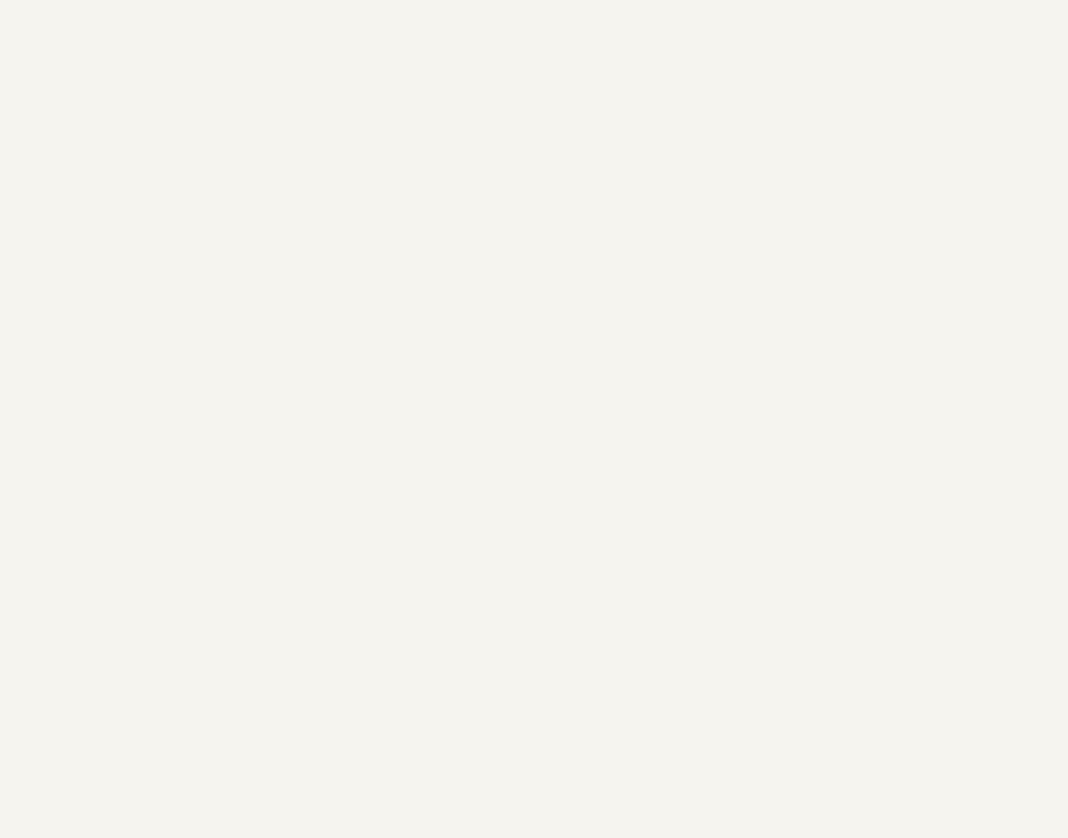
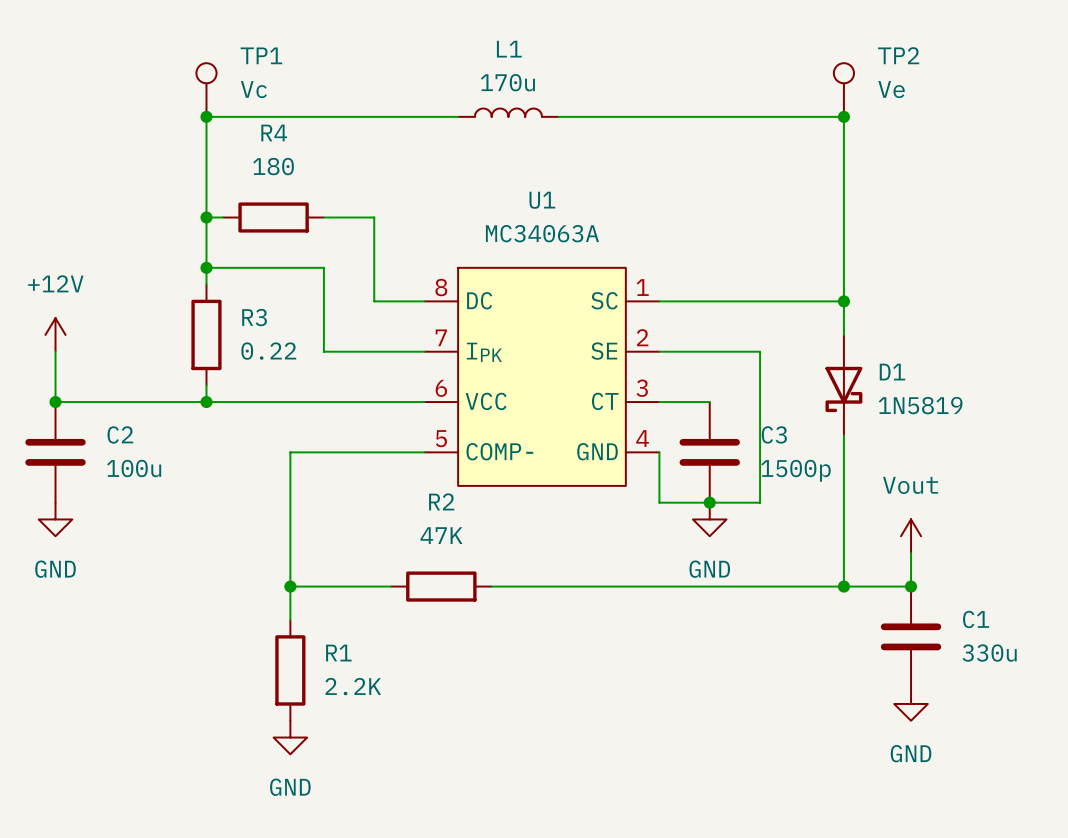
TP1: none -> Vc (206, 90)
TP2: none -> Ve (843, 90)
L1: none -> 170u (508, 112)
junction: none -> (206, 116)
wire: none -> (458, 116) (206, 116) (206, 284)
wire: none -> (558, 116) (843, 116) (843, 334)
junction: none -> (843, 116)
wire: none -> (206, 217) (223, 217)
junction: none -> (206, 217)
R4: none -> 180 (273, 217)
wire: none -> (323, 217) (374, 217) (374, 301) (424, 301)
wire: none -> (206, 267) (323, 267) (323, 351) (424, 351)
junction: none -> (206, 267)
wire: none -> (659, 301) (843, 301)
junction: none -> (843, 301)
power symbol: none -> +12V (55, 334)
R3: none -> 0.22 (206, 334)
wire: none -> (55, 351) (55, 402) (424, 402)
wire: none -> (659, 351) (760, 351) (760, 502) (659, 502) (659, 452)
U1: none -> MC34063A (541, 376)
wire: none -> (206, 385) (206, 402)
D1: none -> 1N5819 (843, 385)
junction: none -> (55, 402)
junction: none -> (206, 402)
wire: none -> (659, 402) (709, 402)
wire: none -> (843, 435) (843, 586)
C2: none -> 100u (55, 452)
wire: none -> (424, 452) (290, 452) (290, 620)
C3: none -> 1500p (709, 452)
junction: none -> (709, 502)
power symbol: none -> GND (55, 519)
power symbol: none -> GND (709, 519)
power symbol: none -> Vout (911, 536)
wire: none -> (911, 553) (911, 586) (491, 586)
wire: none -> (290, 586) (391, 586)
junction: none -> (290, 586)
R2: none -> 47K (441, 586)
junction: none -> (843, 586)
junction: none -> (911, 586)
C1: none -> 330u (911, 636)
R1: none -> 2.2K (290, 670)
power symbol: none -> GND (911, 703)
power symbol: none -> GND (290, 737)

